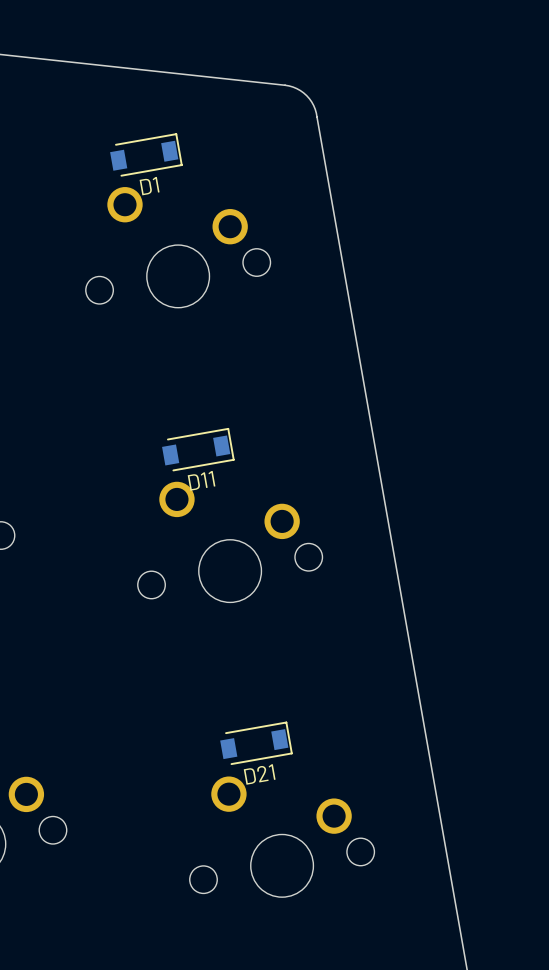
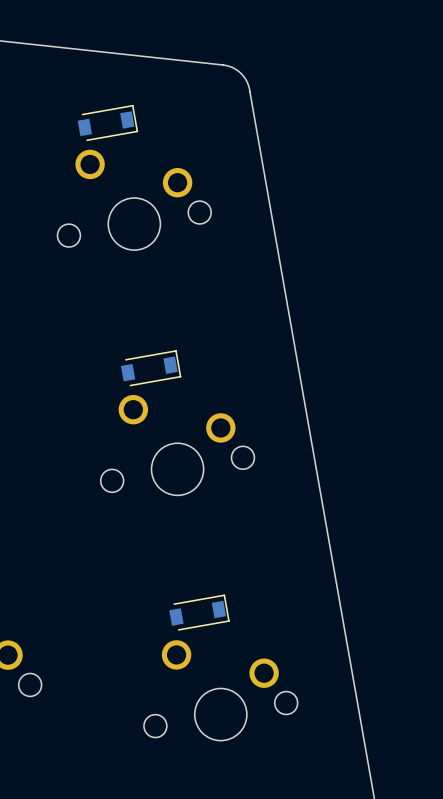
D1 name: D1 (149, 186) -> none
D11 name: D11 (201, 480) -> none
D21 name: D21 (259, 774) -> none

